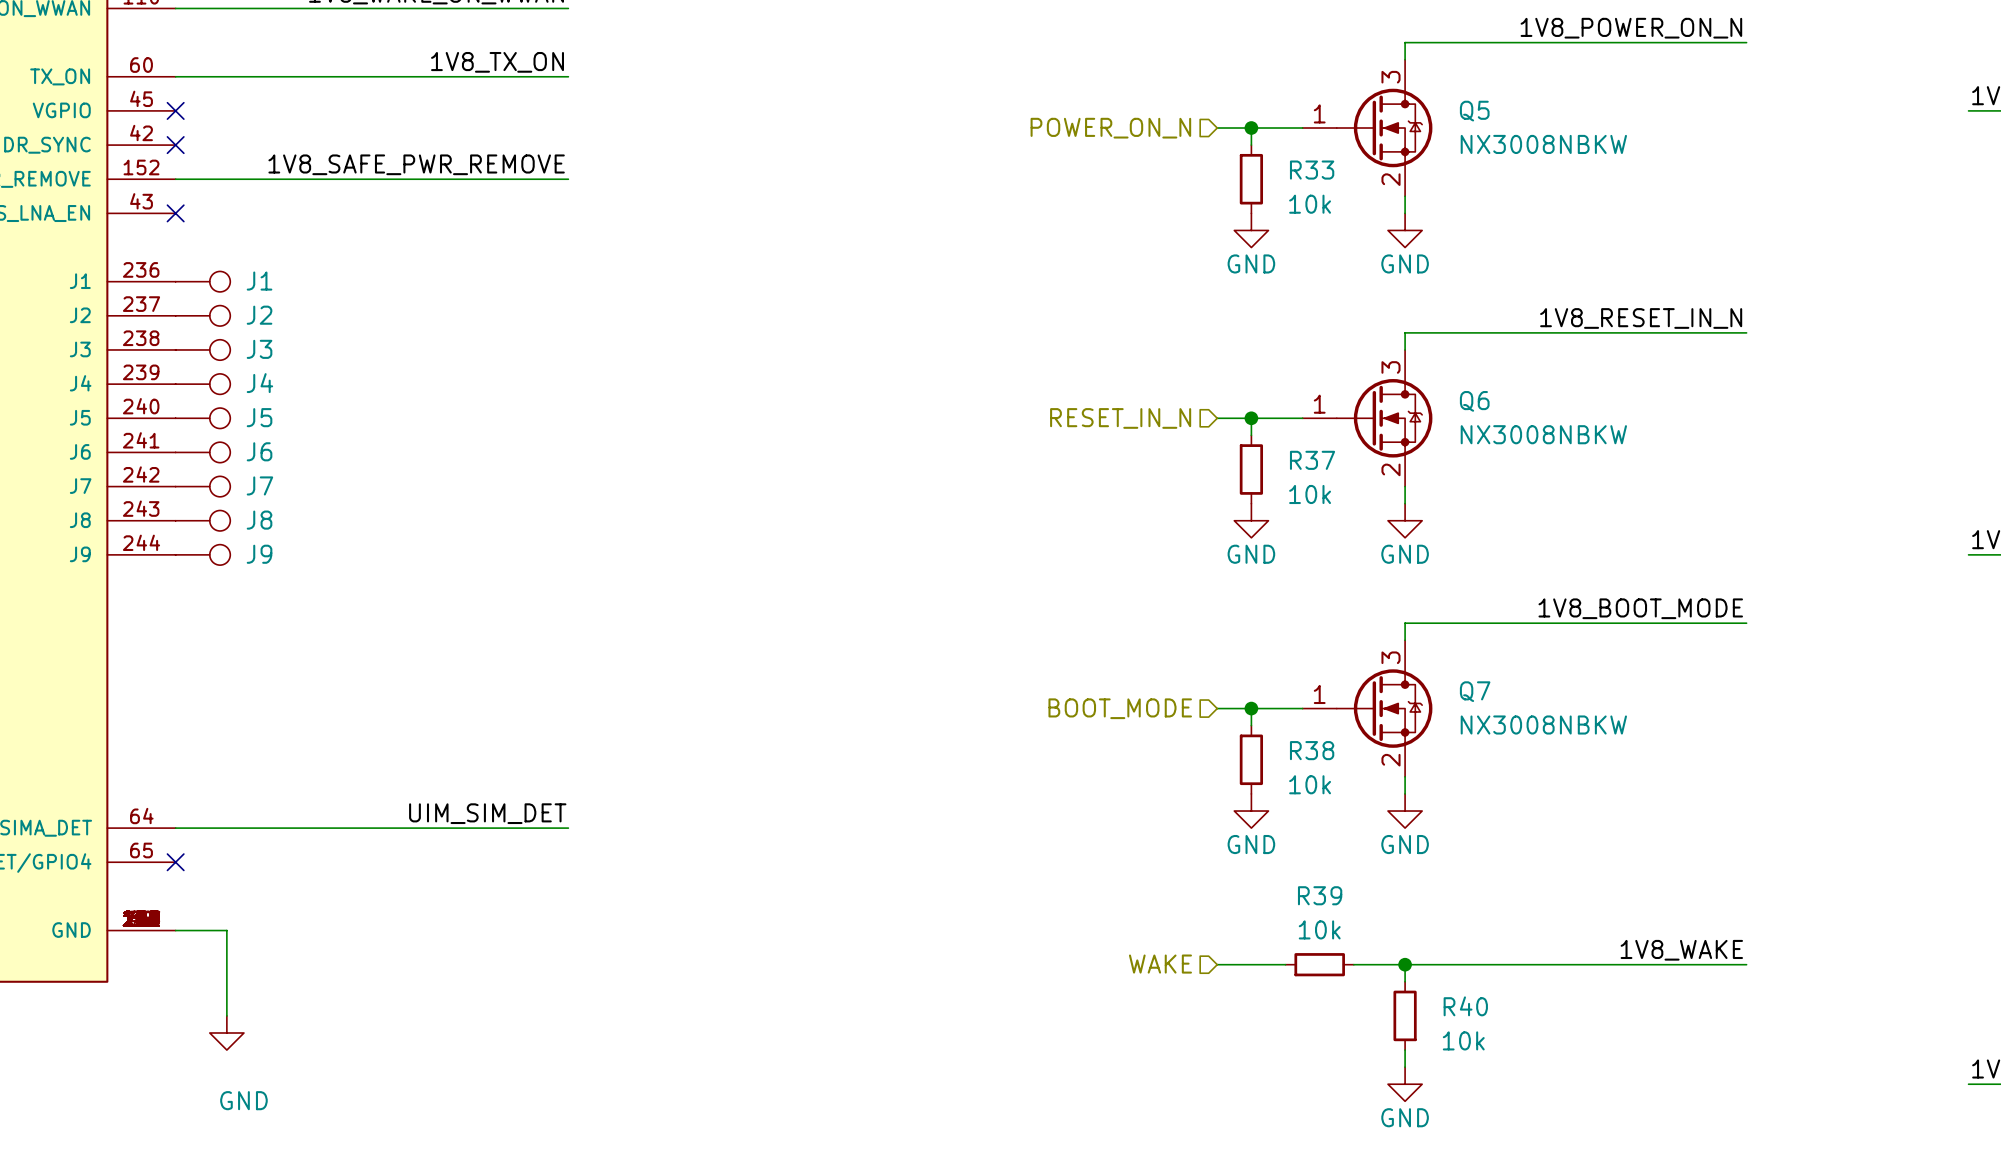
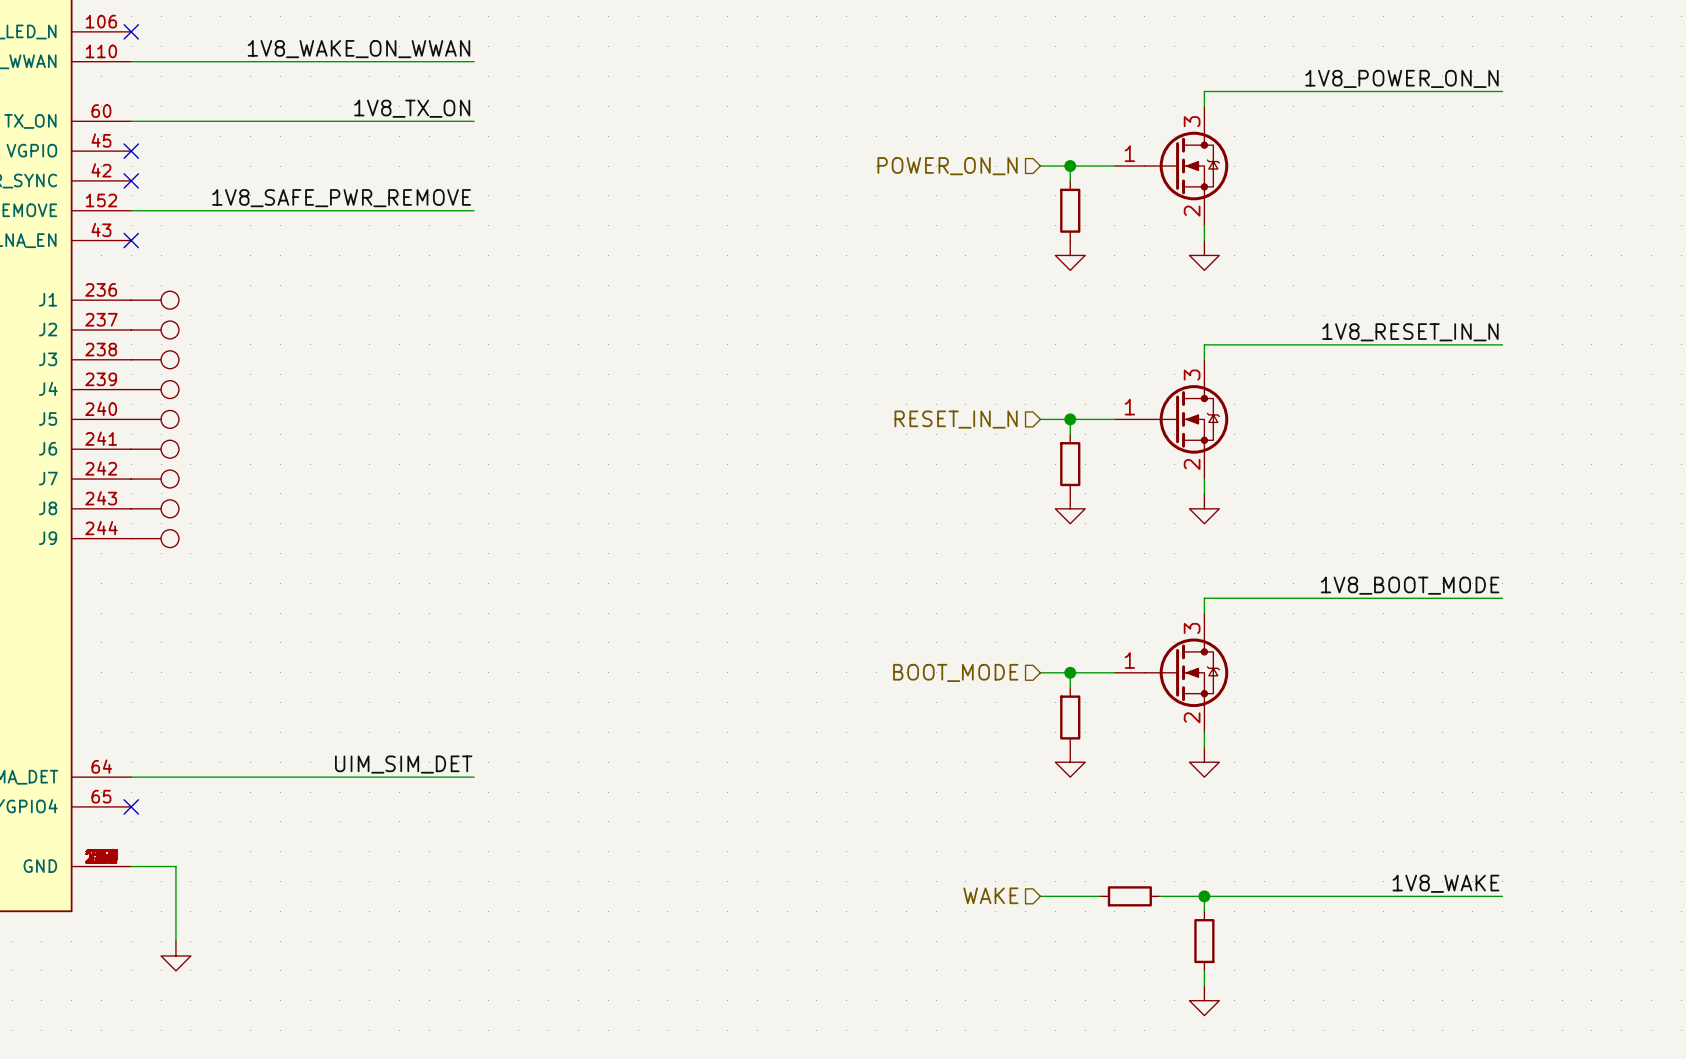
Q5 name: Q5 (1474, 111) -> none
Q5 value: NX3008NBKW (1543, 144) -> none
R33 name: R33 (1312, 170) -> none
R33 value: 10k (1310, 204) -> none
power symbol text: GND (1251, 263) -> none
power symbol text: GND (1405, 263) -> none
J1 name: J1 (259, 281) -> none
J2 name: J2 (259, 315) -> none
J3 name: J3 (259, 349) -> none
J4 name: J4 (259, 383) -> none
Q6 name: Q6 (1474, 401) -> none
J5 name: J5 (259, 417) -> none
Q6 value: NX3008NBKW (1543, 434) -> none
J6 name: J6 (259, 451) -> none
R37 name: R37 (1312, 460) -> none
J7 name: J7 (259, 485) -> none
R37 value: 10k (1310, 494) -> none
J8 name: J8 (259, 520) -> none
J9 name: J9 (259, 554) -> none
power symbol text: GND (1251, 554) -> none
power symbol text: GND (1405, 554) -> none
Q7 name: Q7 (1475, 691) -> none
Q7 value: NX3008NBKW (1543, 725) -> none
R38 name: R38 (1312, 750) -> none
R38 value: 10k (1310, 784) -> none
power symbol text: GND (1251, 844) -> none
power symbol text: GND (1405, 844) -> none
R39 name: R39 (1320, 895) -> none
R39 value: 10k (1319, 929) -> none
R40 name: R40 (1465, 1006) -> none
R40 value: 10k (1463, 1040) -> none
power symbol text: GND (243, 1100) -> none
power symbol text: GND (1405, 1117) -> none

